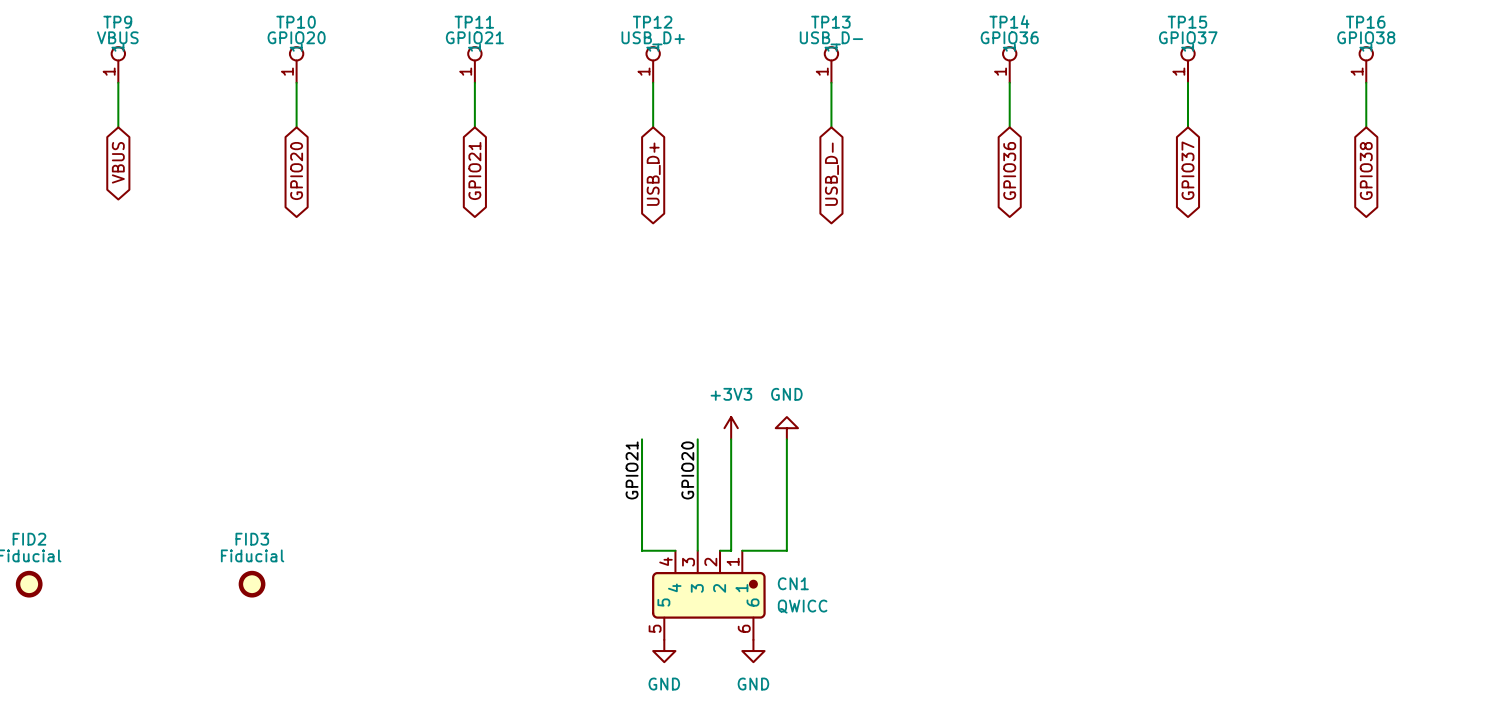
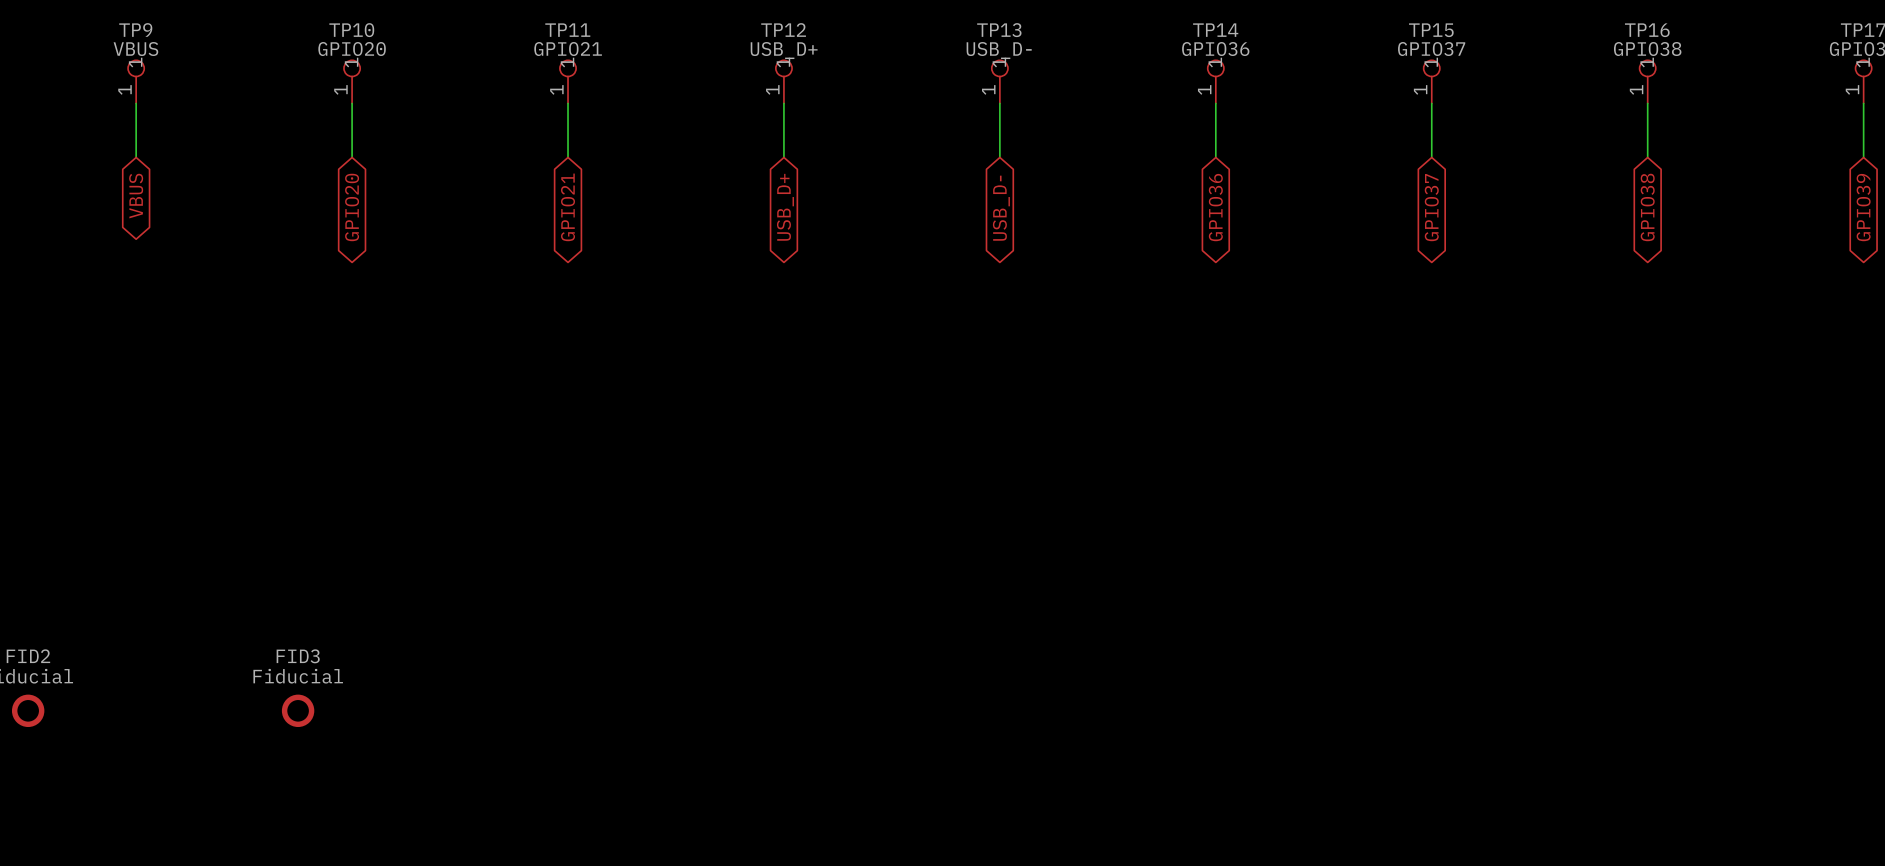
power symbol: +3V3 (731, 428) -> none
power symbol: GND (786, 428) -> none
wire: (642, 439) (642, 550) (675, 550) -> none
wire: (697, 439) (697, 550) -> none
wire: (731, 439) (731, 550) (720, 550) -> none
wire: (786, 439) (786, 550) (742, 550) -> none
label: GPIO21 (632, 470) -> none
label: GPIO20 (687, 470) -> none
CN1: QWICC (708, 595) -> none
power symbol: GND (664, 651) -> none
power symbol: GND (753, 651) -> none

